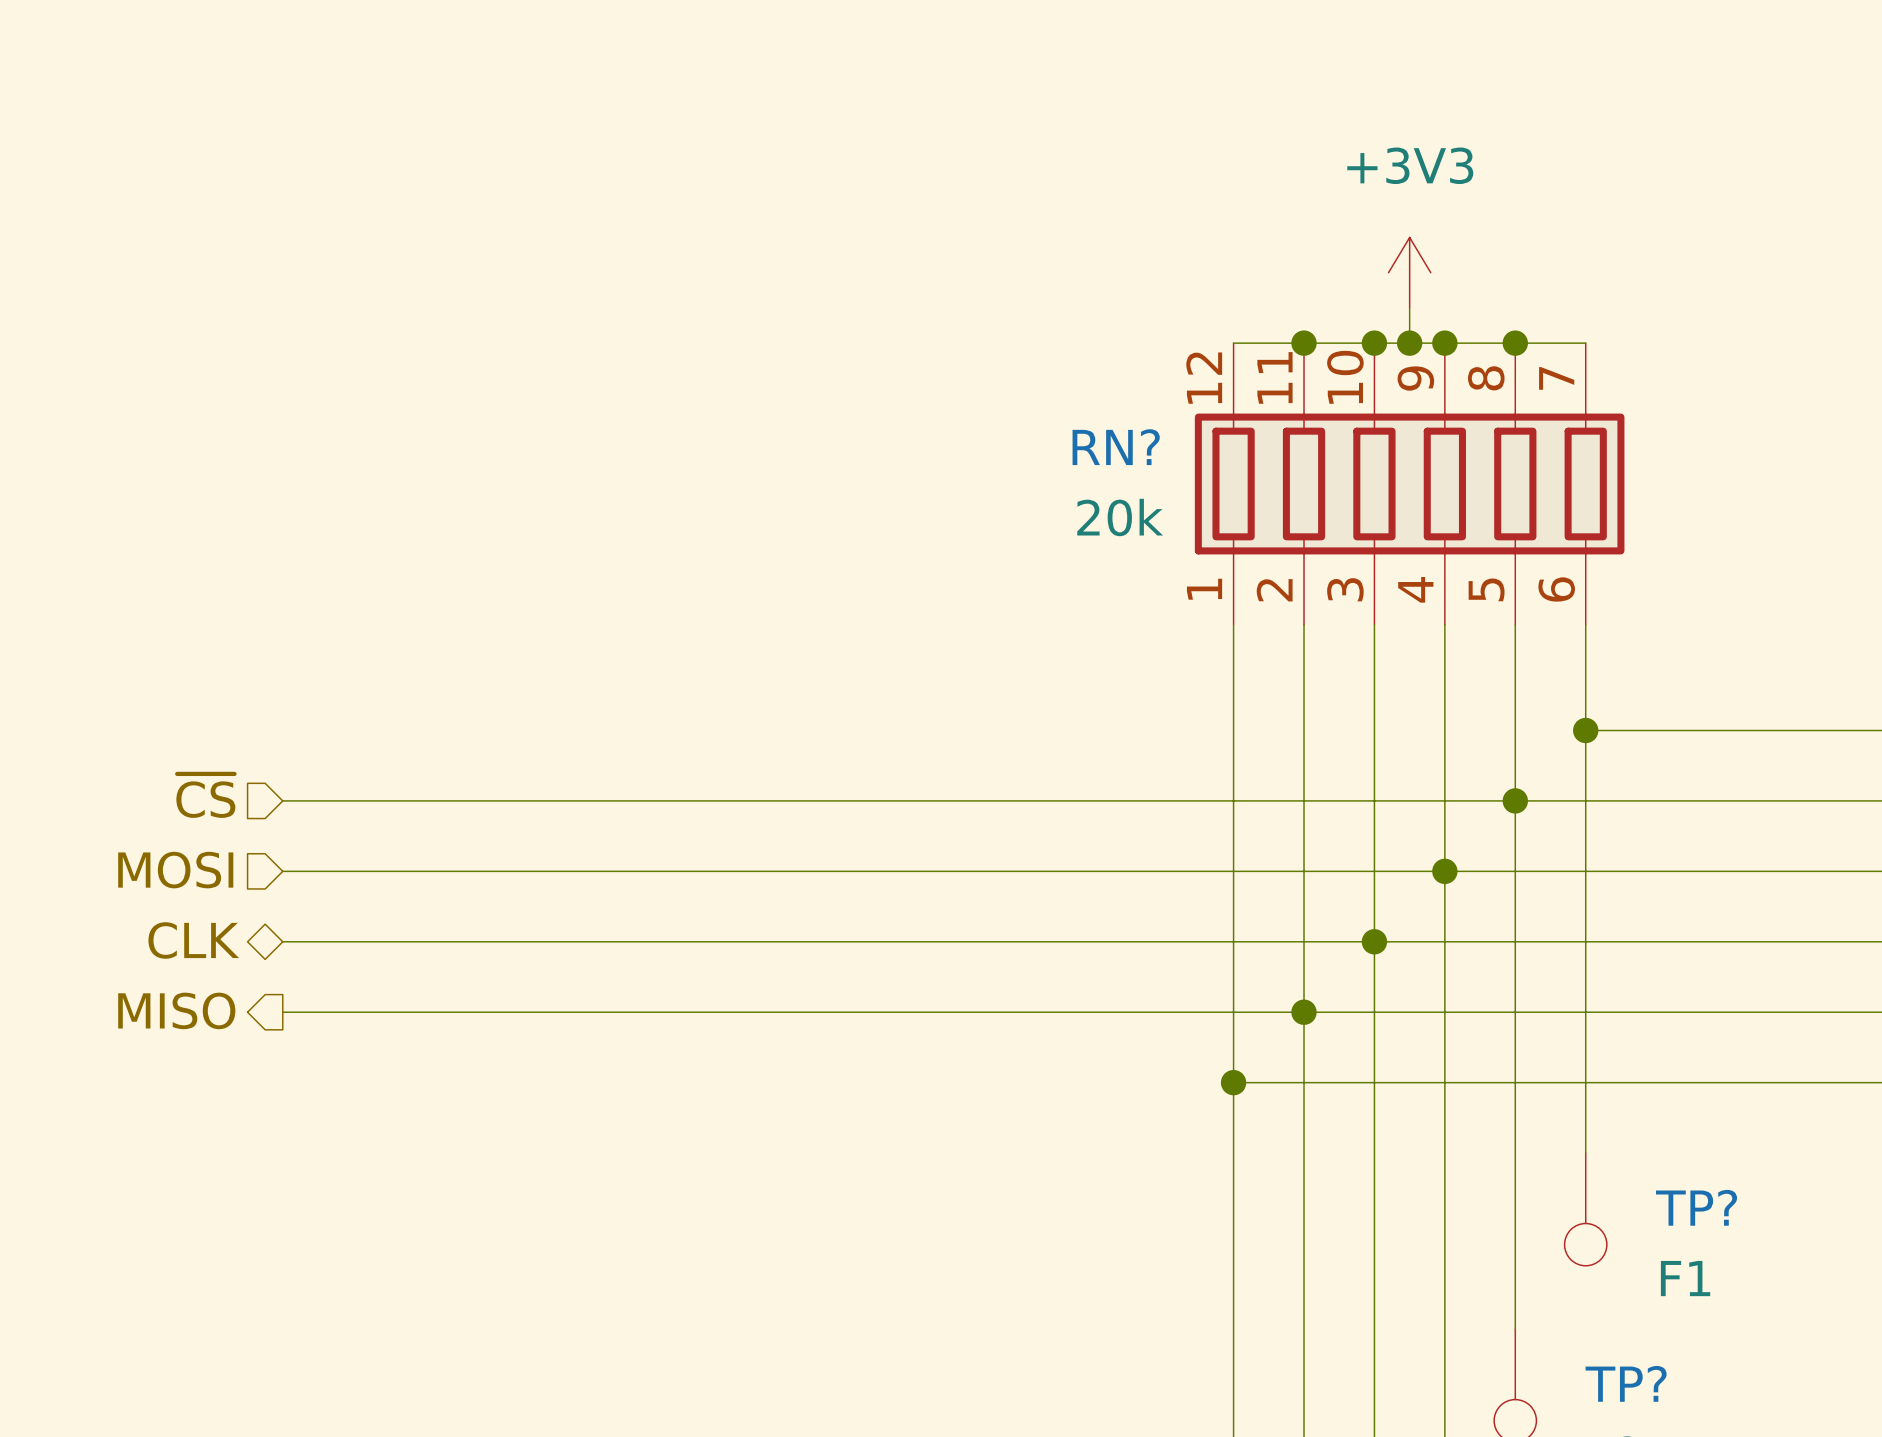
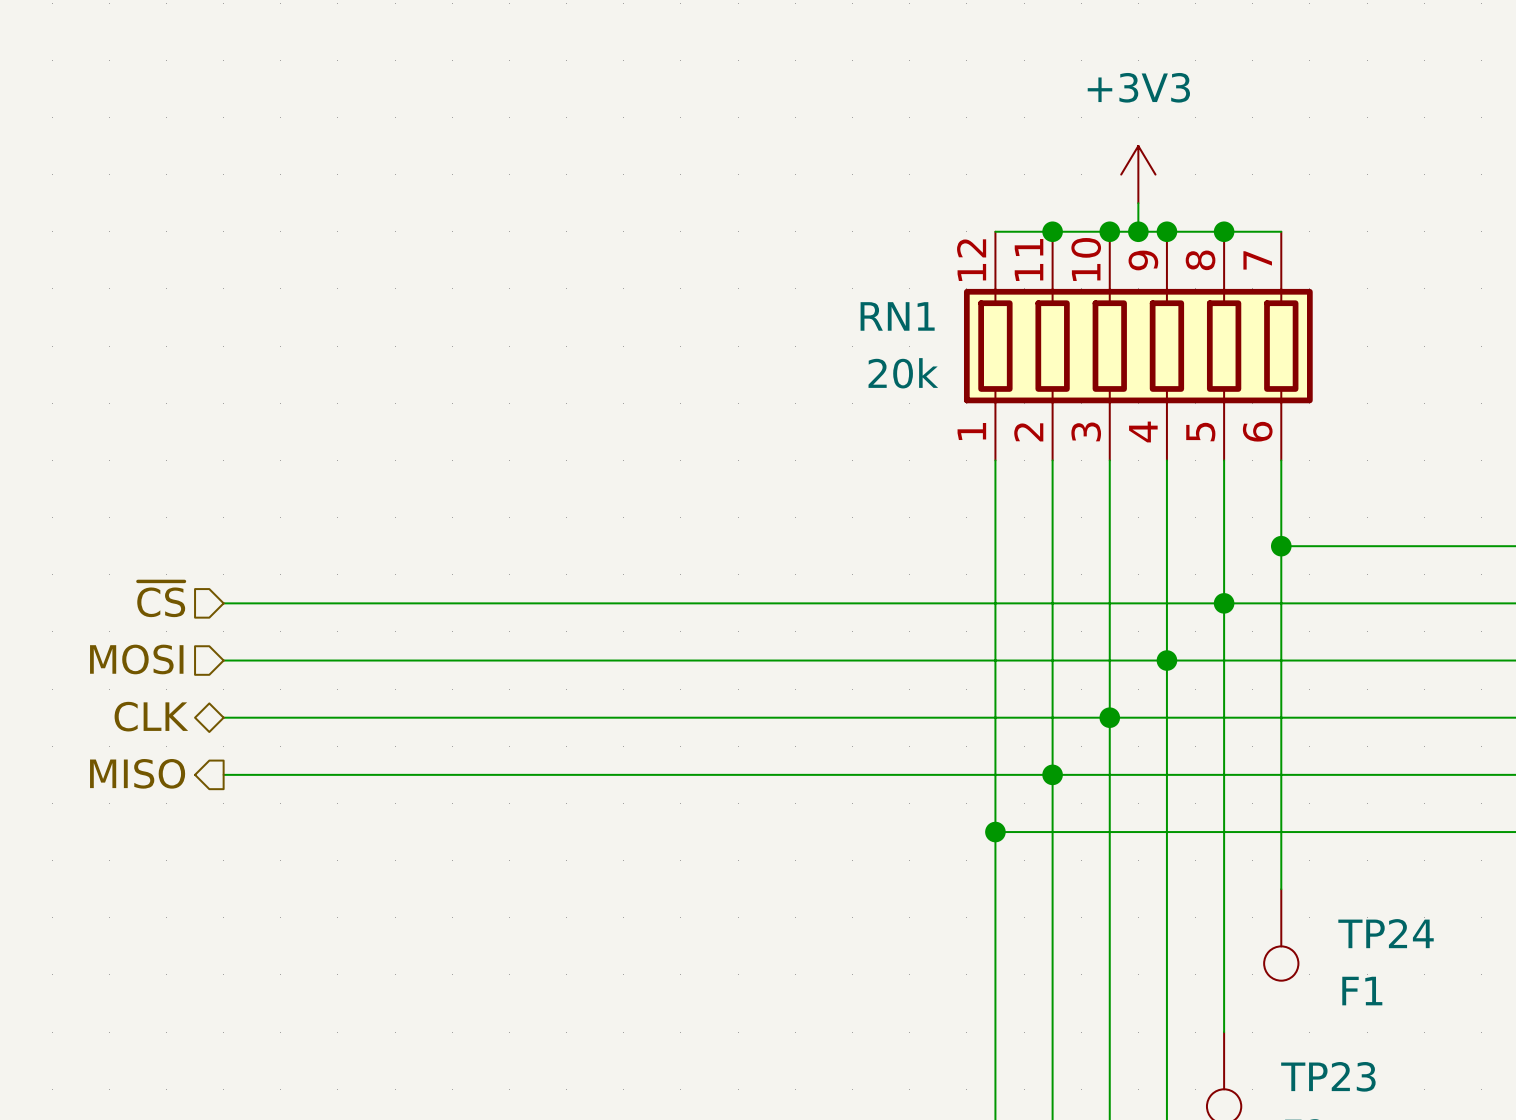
RN? name: RN? (1116, 447) -> RN1 (897, 316)
TP? name: TP? (1696, 1207) -> TP24 (1386, 933)
TP? name: TP? (1626, 1383) -> TP23 (1328, 1076)

